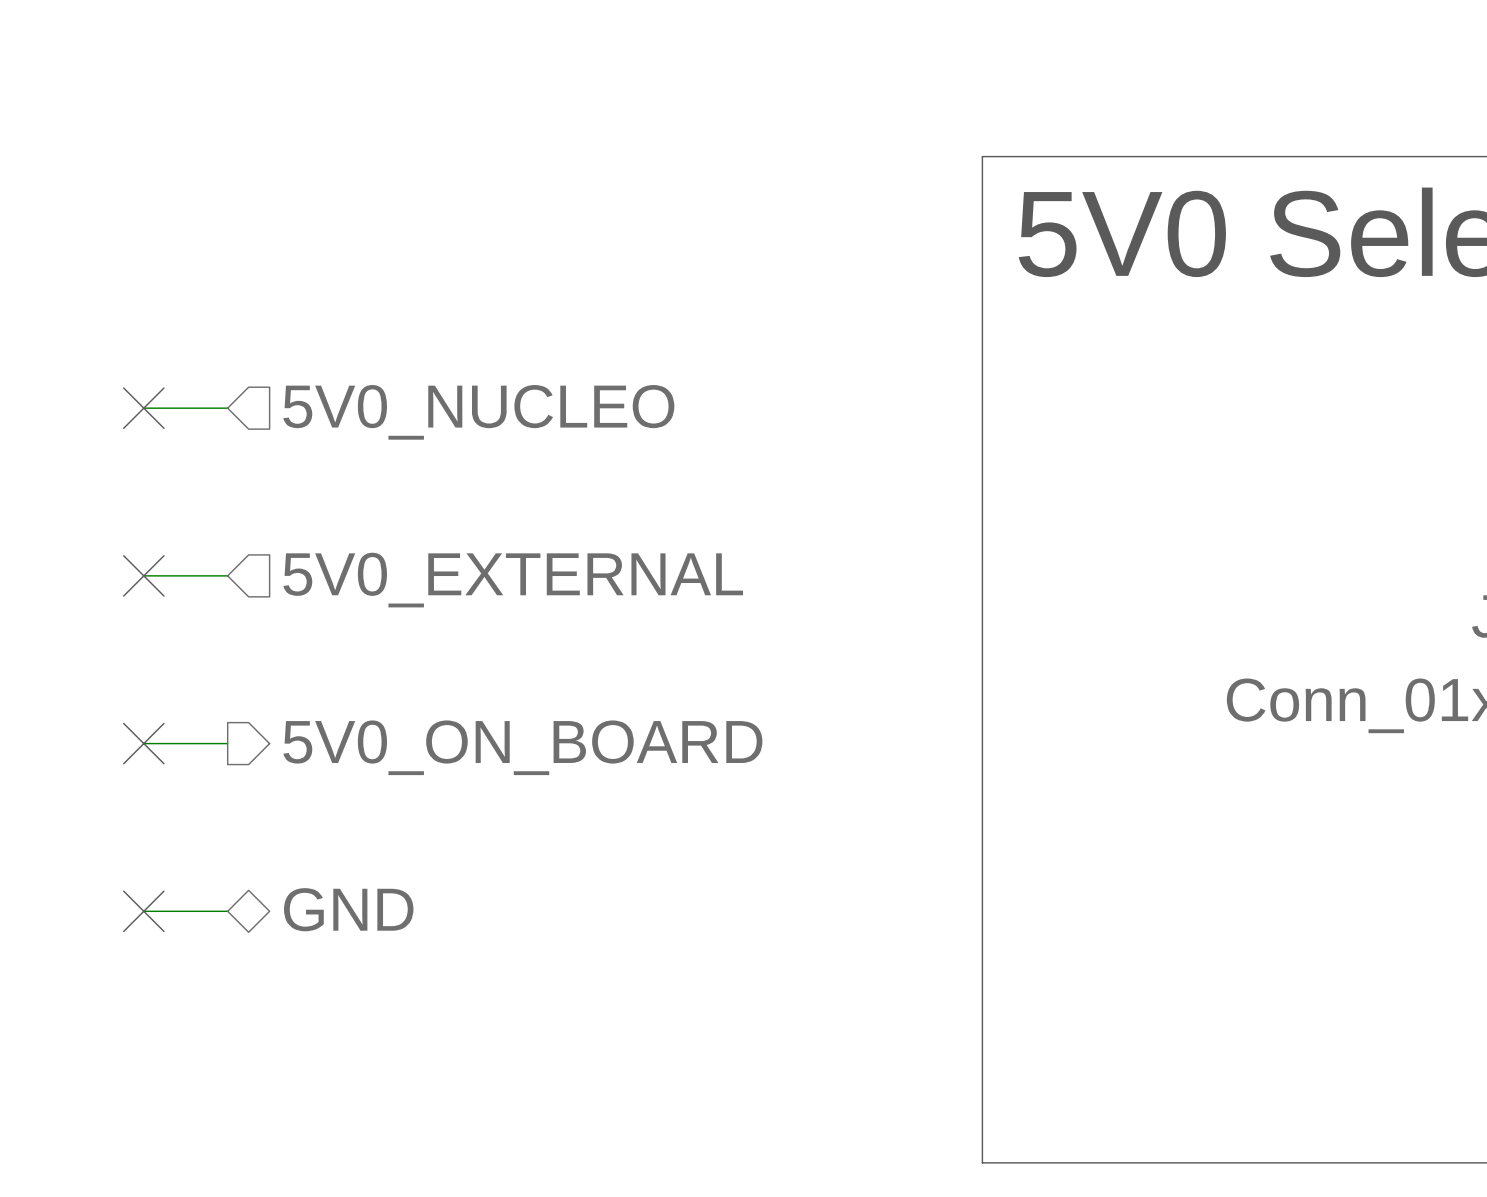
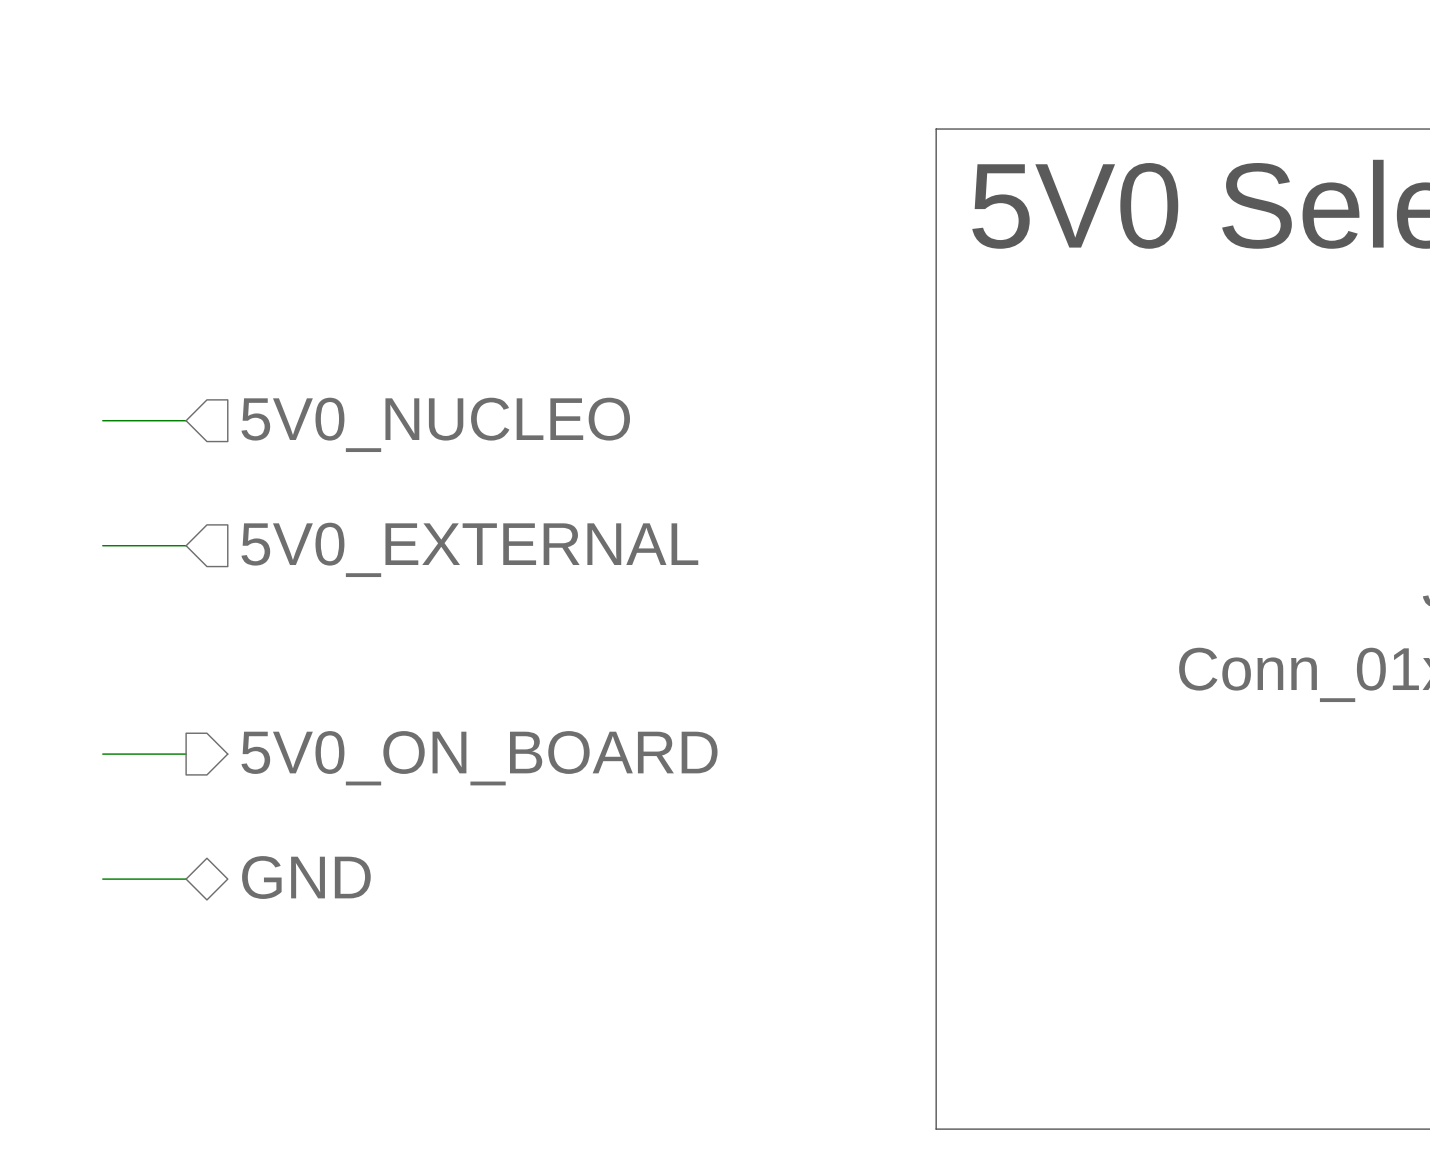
wire: (143, 408) (227, 408) -> (102, 420) (186, 420)
no-connect mark: (143, 408) -> none
hierarchical label position: 5V0_NUCLEO (478, 412) -> 5V0_NUCLEO (435, 424)
no-connect mark: (143, 575) -> none
wire: (143, 743) (227, 743) -> (102, 754) (186, 754)
no-connect mark: (143, 743) -> none
hierarchical label position: 5V0_ON_BOARD (522, 747) -> 5V0_ON_BOARD (479, 758)
no-connect mark: (143, 911) -> none

